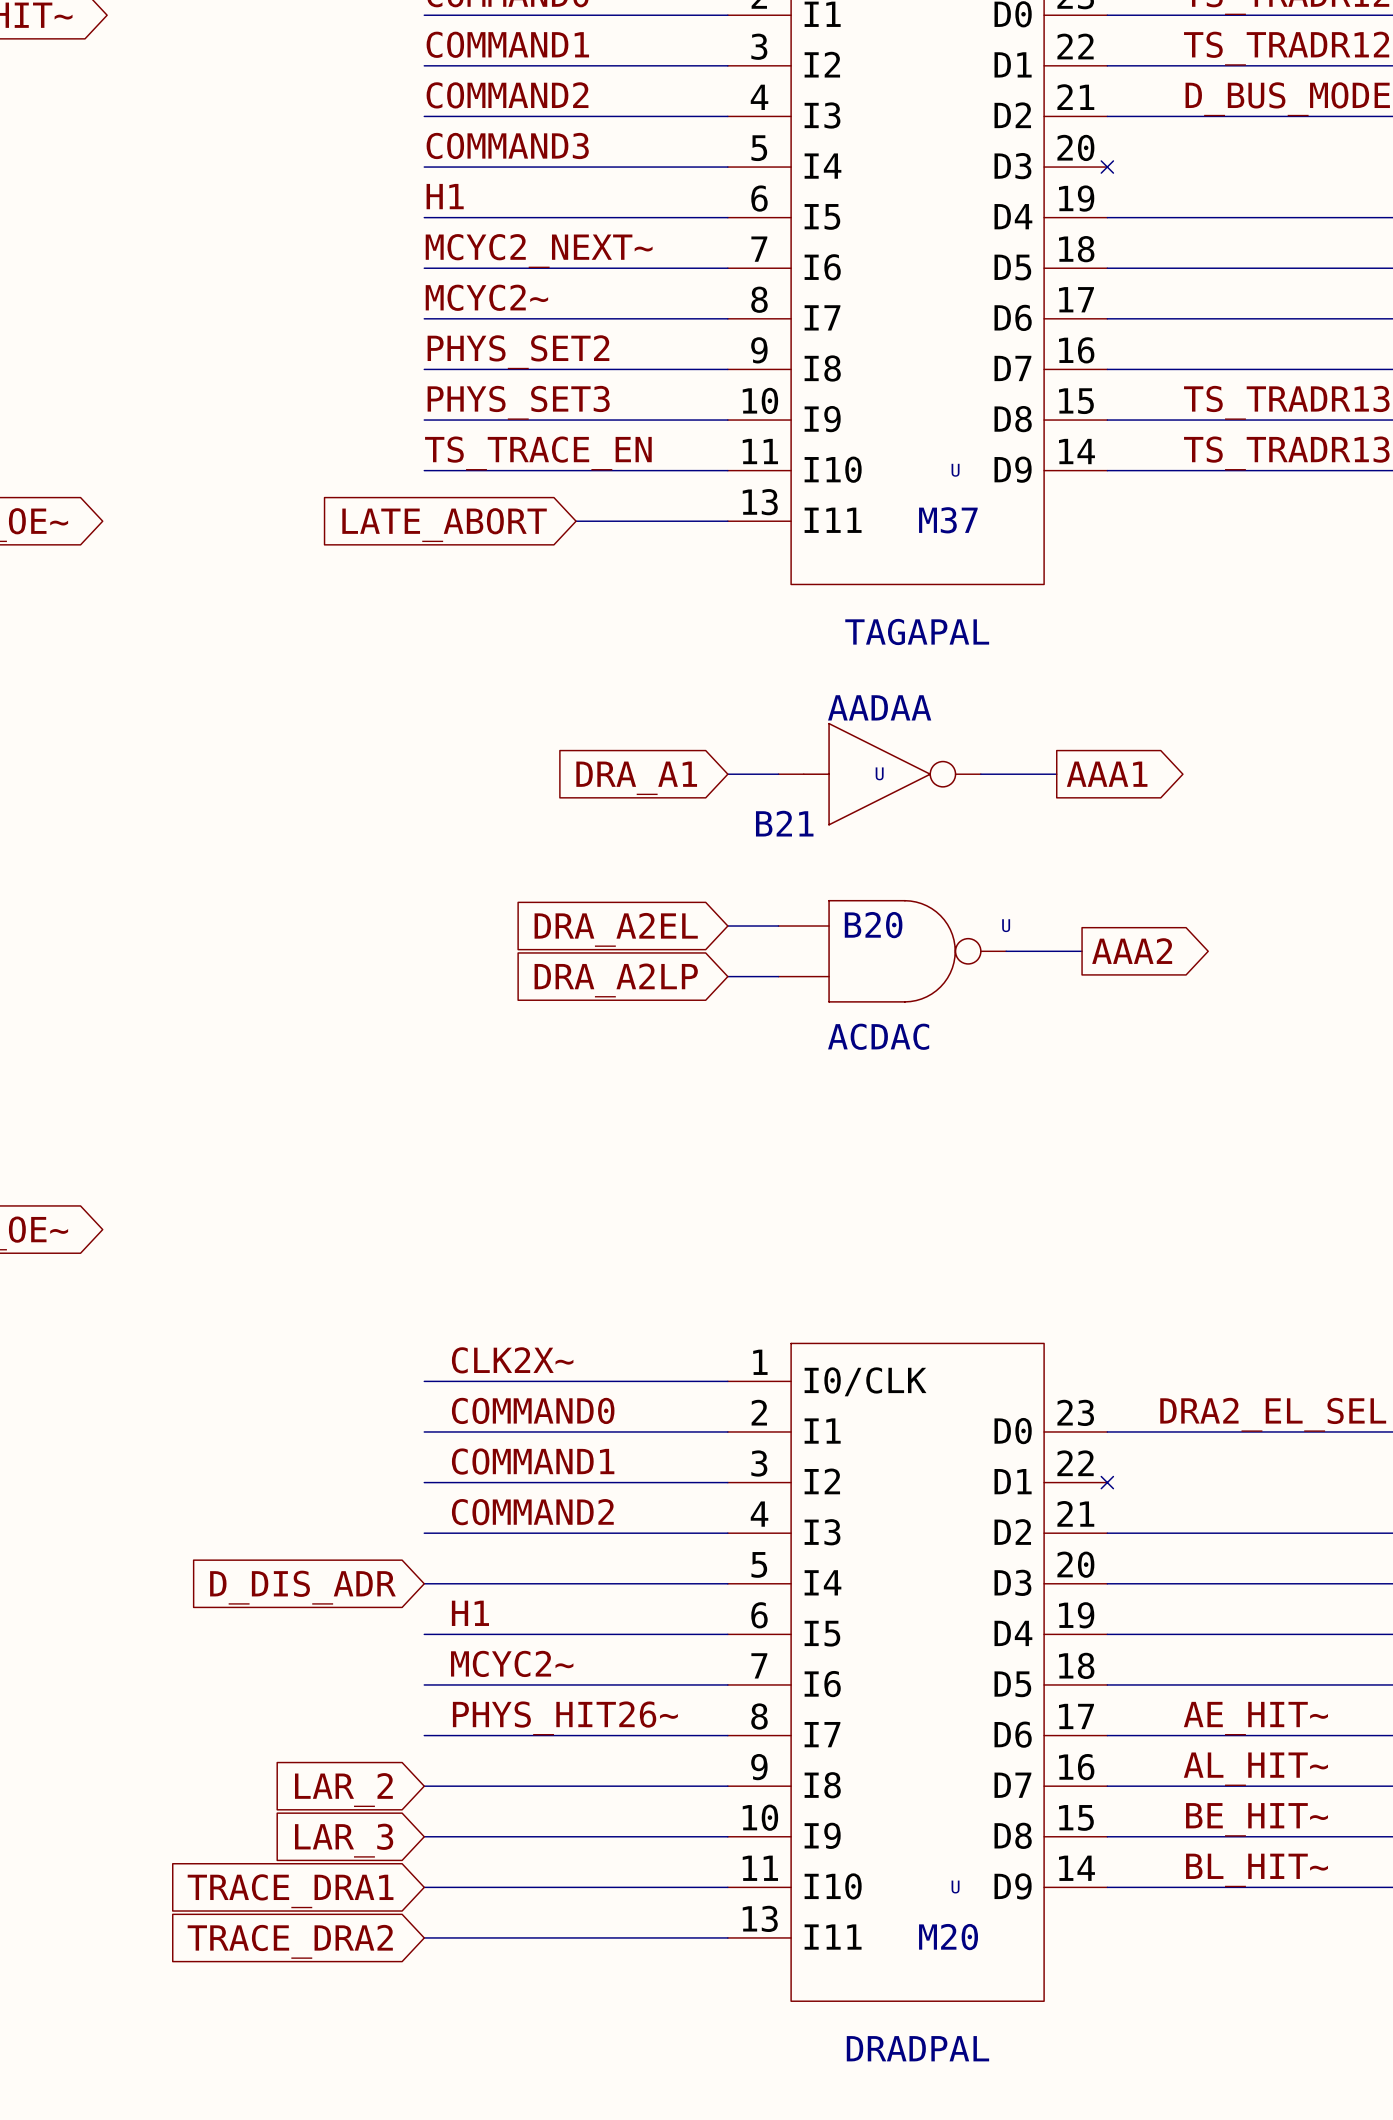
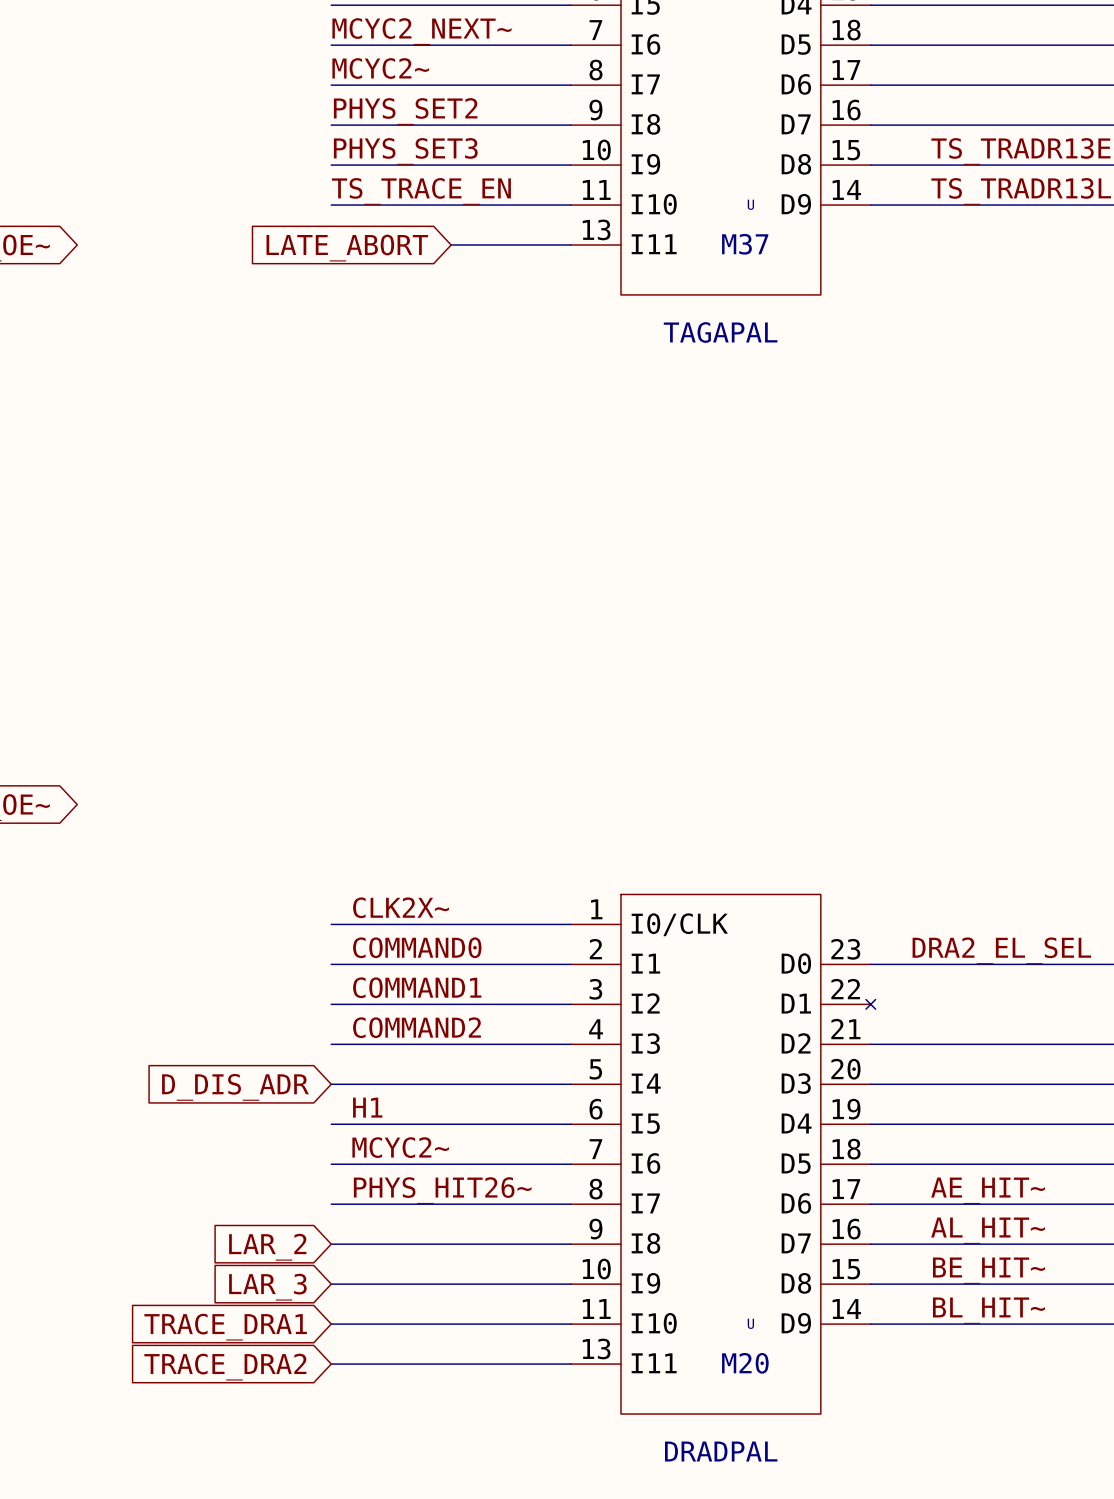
wire: (727, 774) (778, 774) -> none
U: (879, 774) -> none
wire: (980, 774) (1056, 774) -> none
global label: AAA1 (1107, 774) -> none
global label: DRA_A1 (636, 778) -> none
wire: (727, 926) (778, 926) -> none
global label: DRA_A2EL (616, 929) -> none
U: (892, 951) -> none
wire: (1006, 951) (1082, 951) -> none
global label: AAA2 (1132, 951) -> none
wire: (727, 976) (778, 976) -> none
global label: DRA_A2LP (616, 980) -> none

